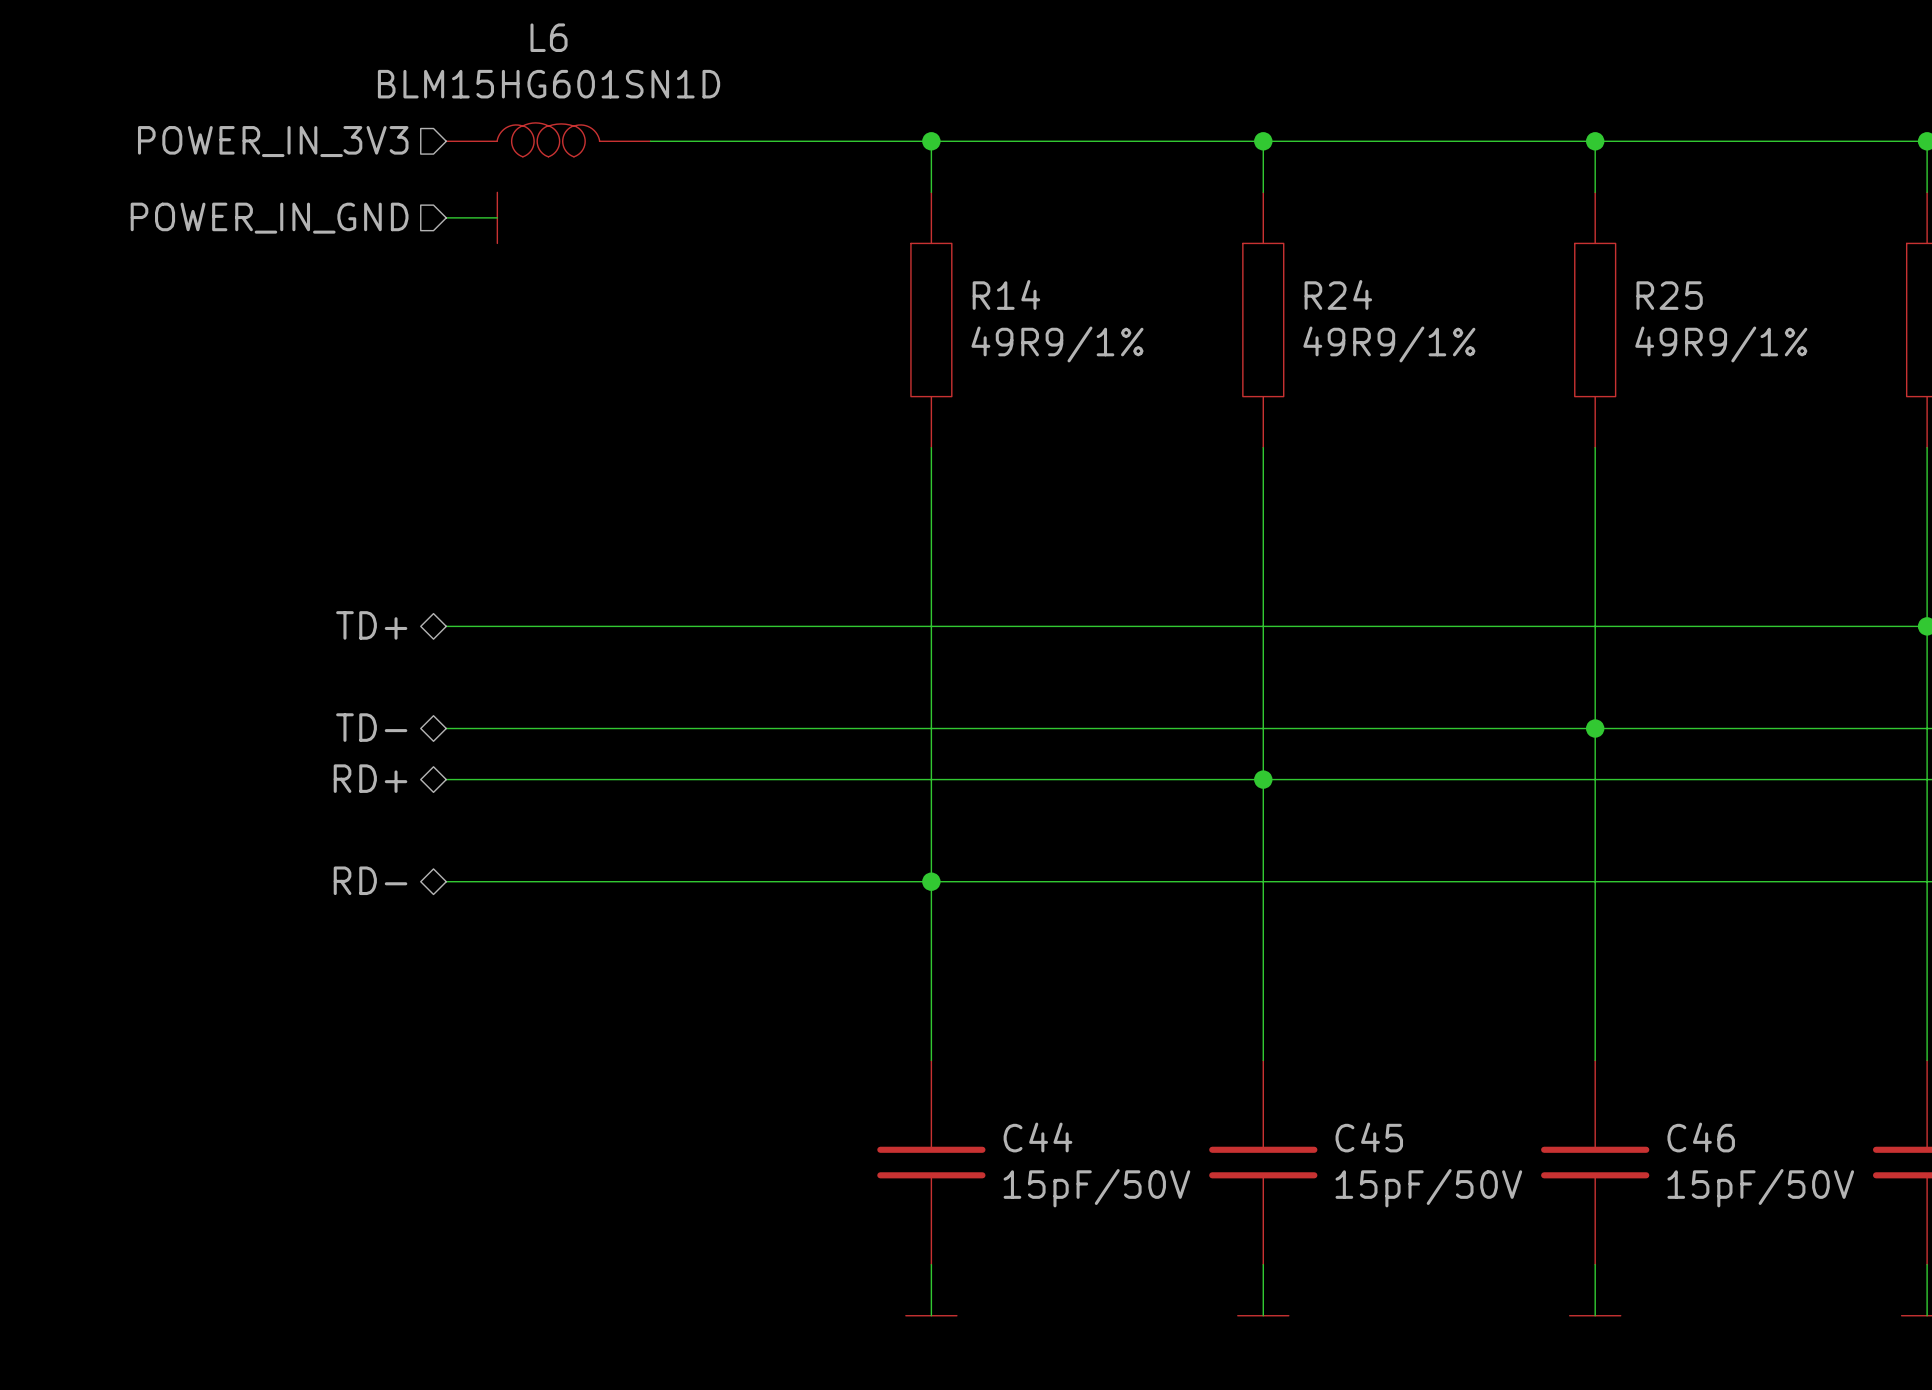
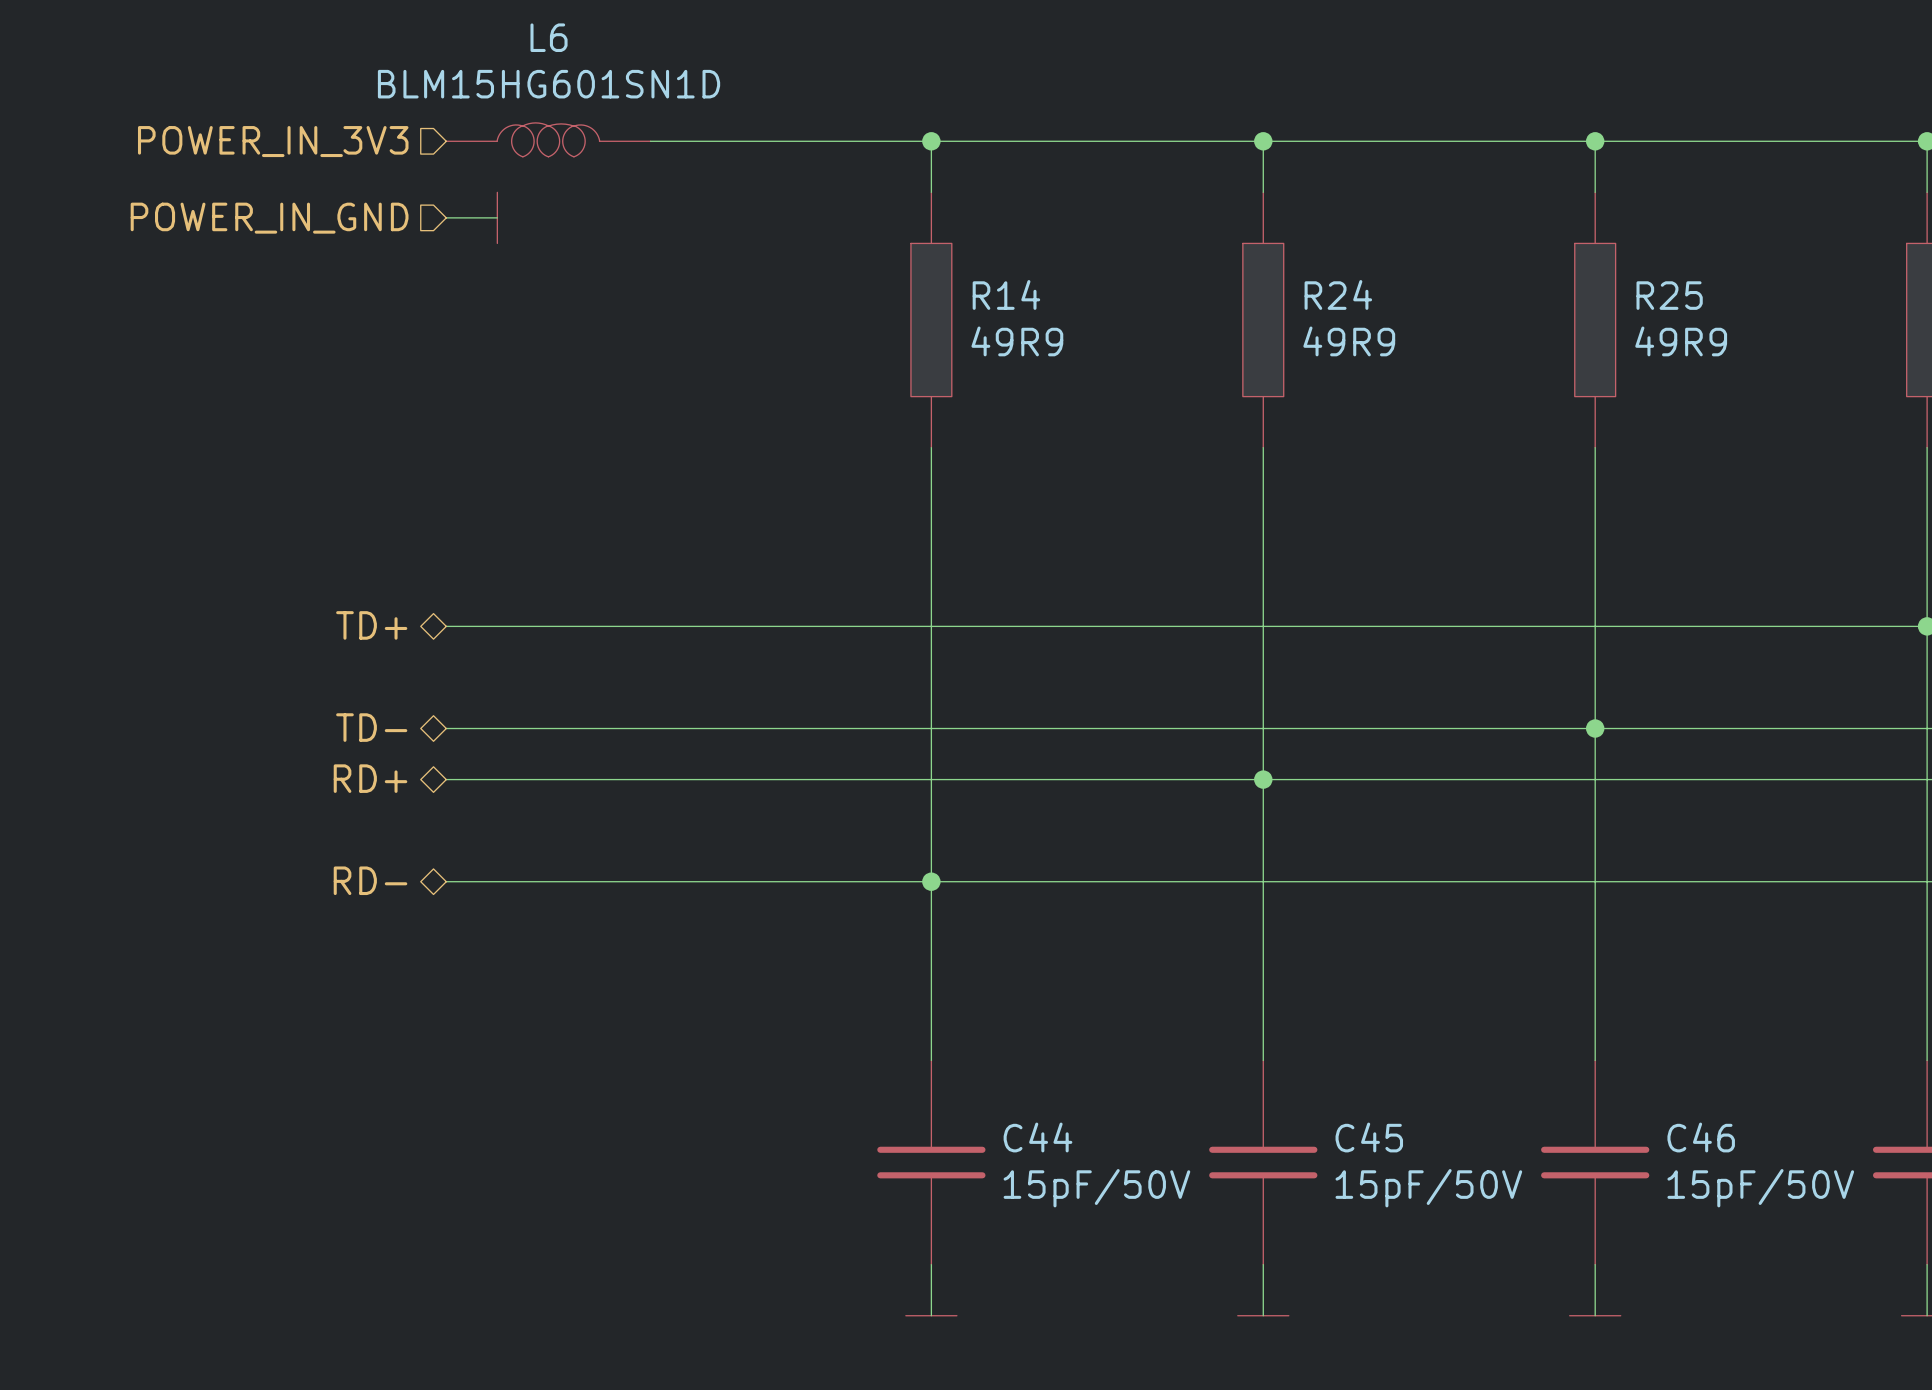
R14 value: 49R9/1% (1057, 344) -> 49R9 (1017, 341)
R24 value: 49R9/1% (1389, 344) -> 49R9 (1349, 341)
R25 value: 49R9/1% (1721, 344) -> 49R9 (1681, 341)

